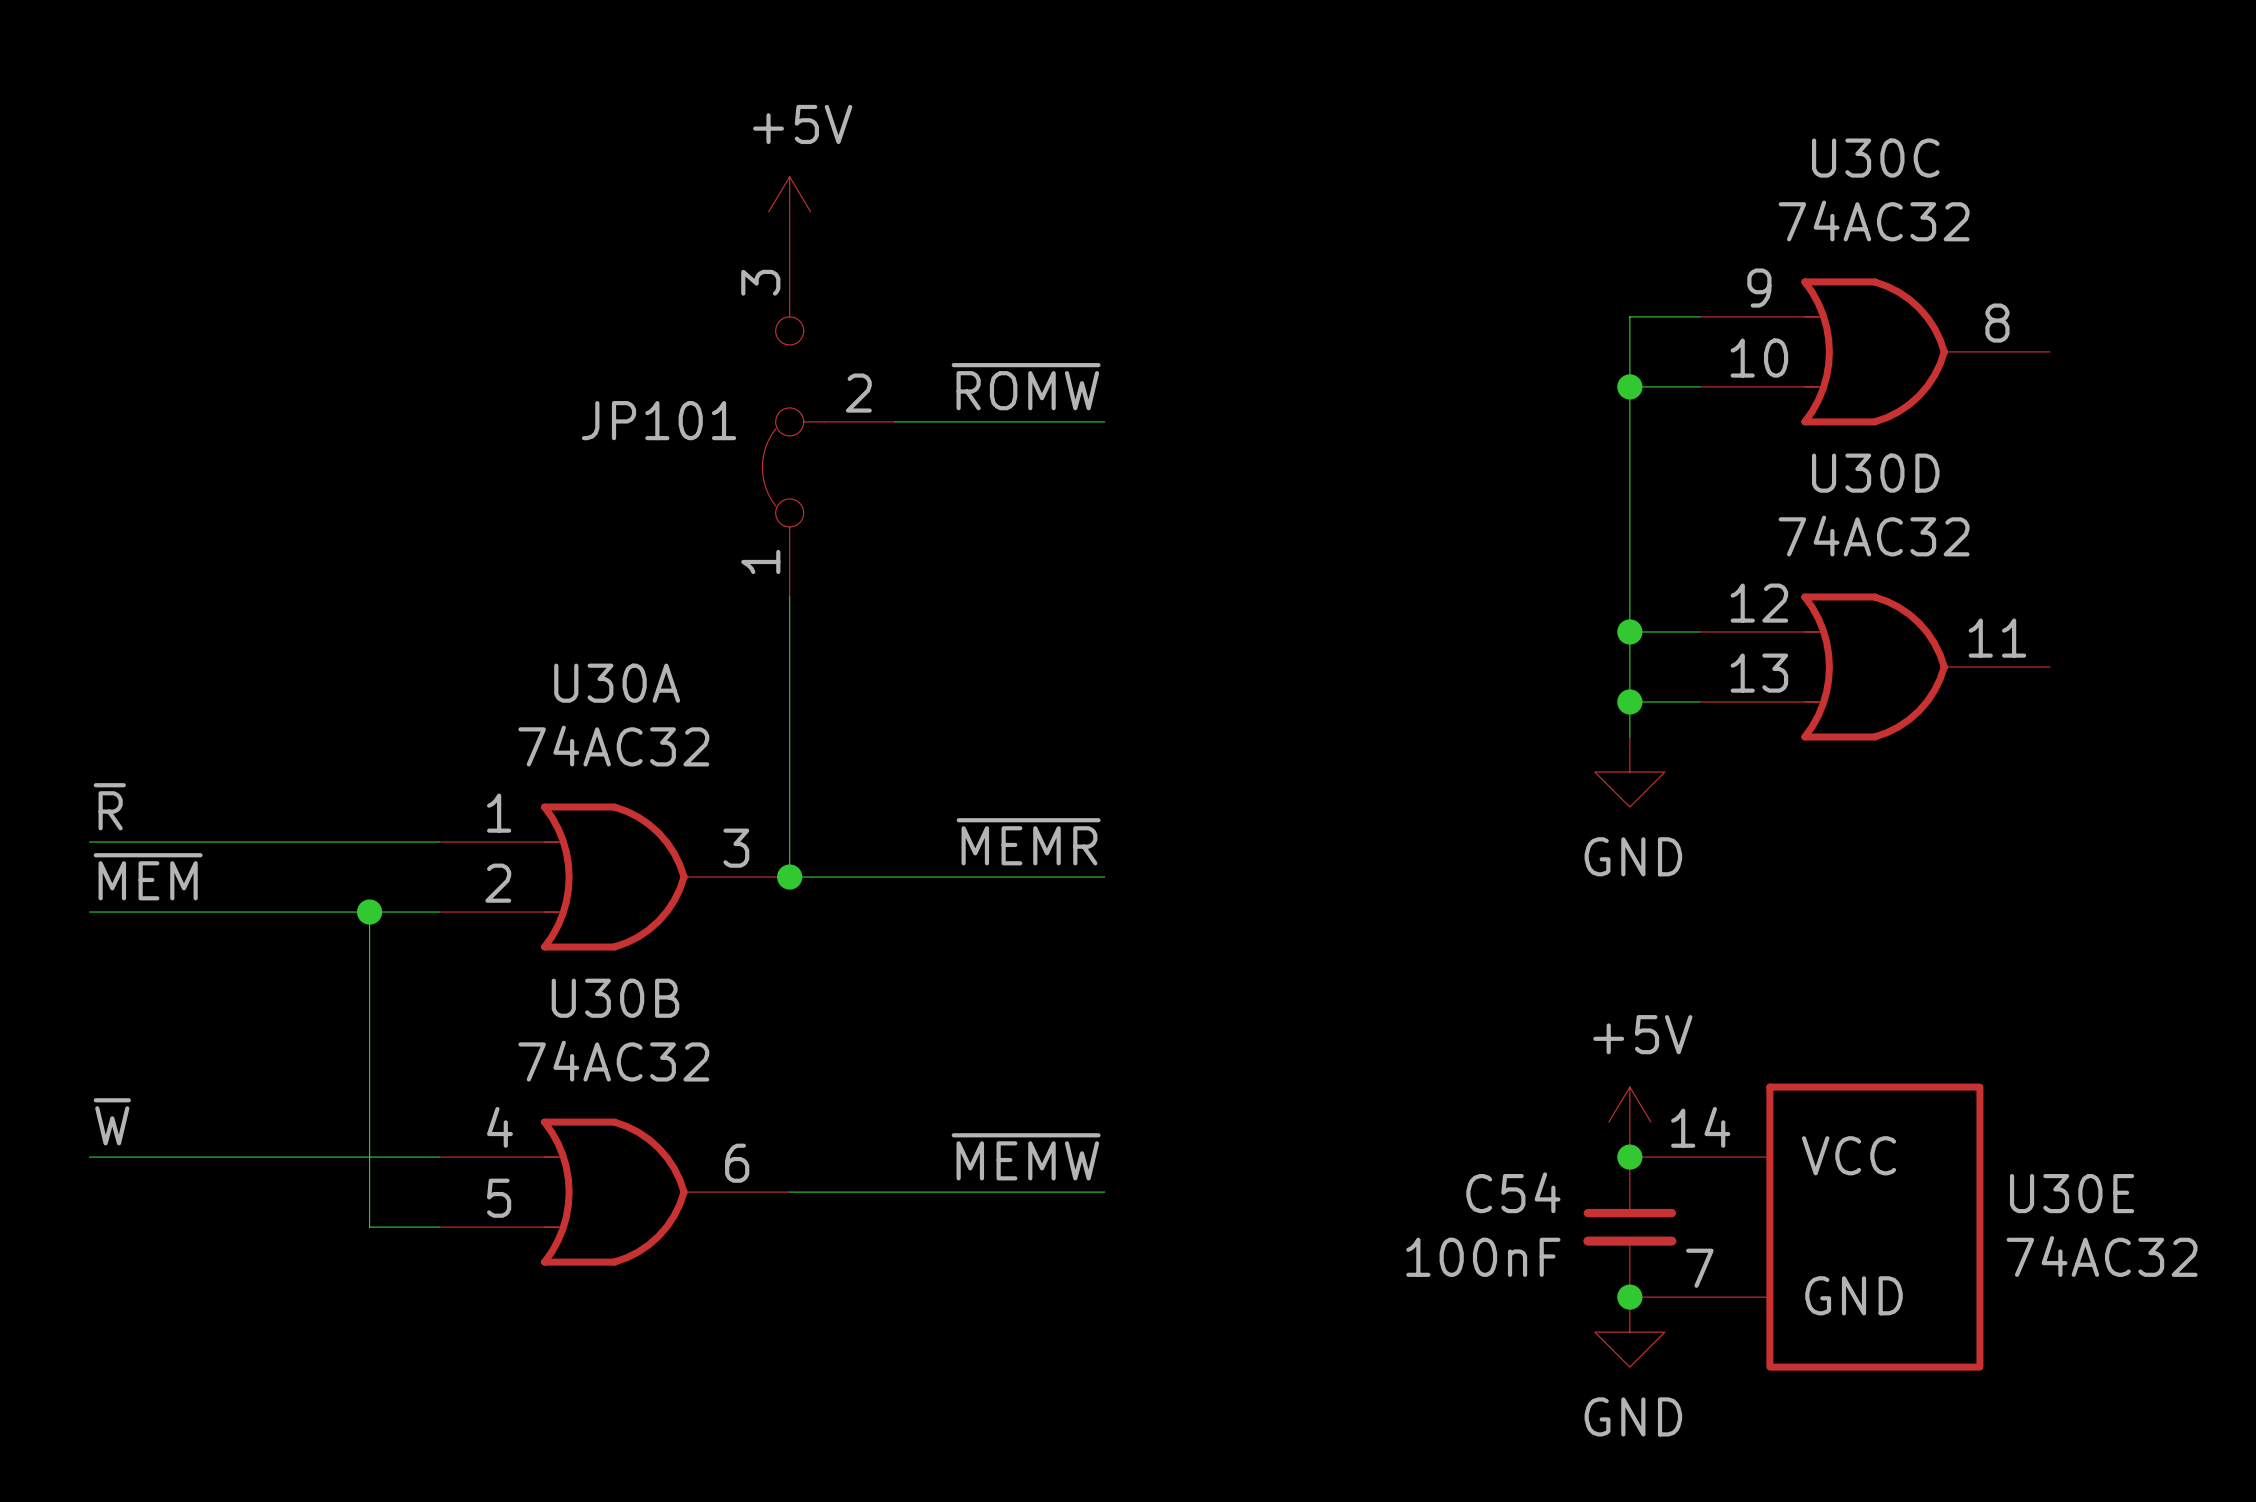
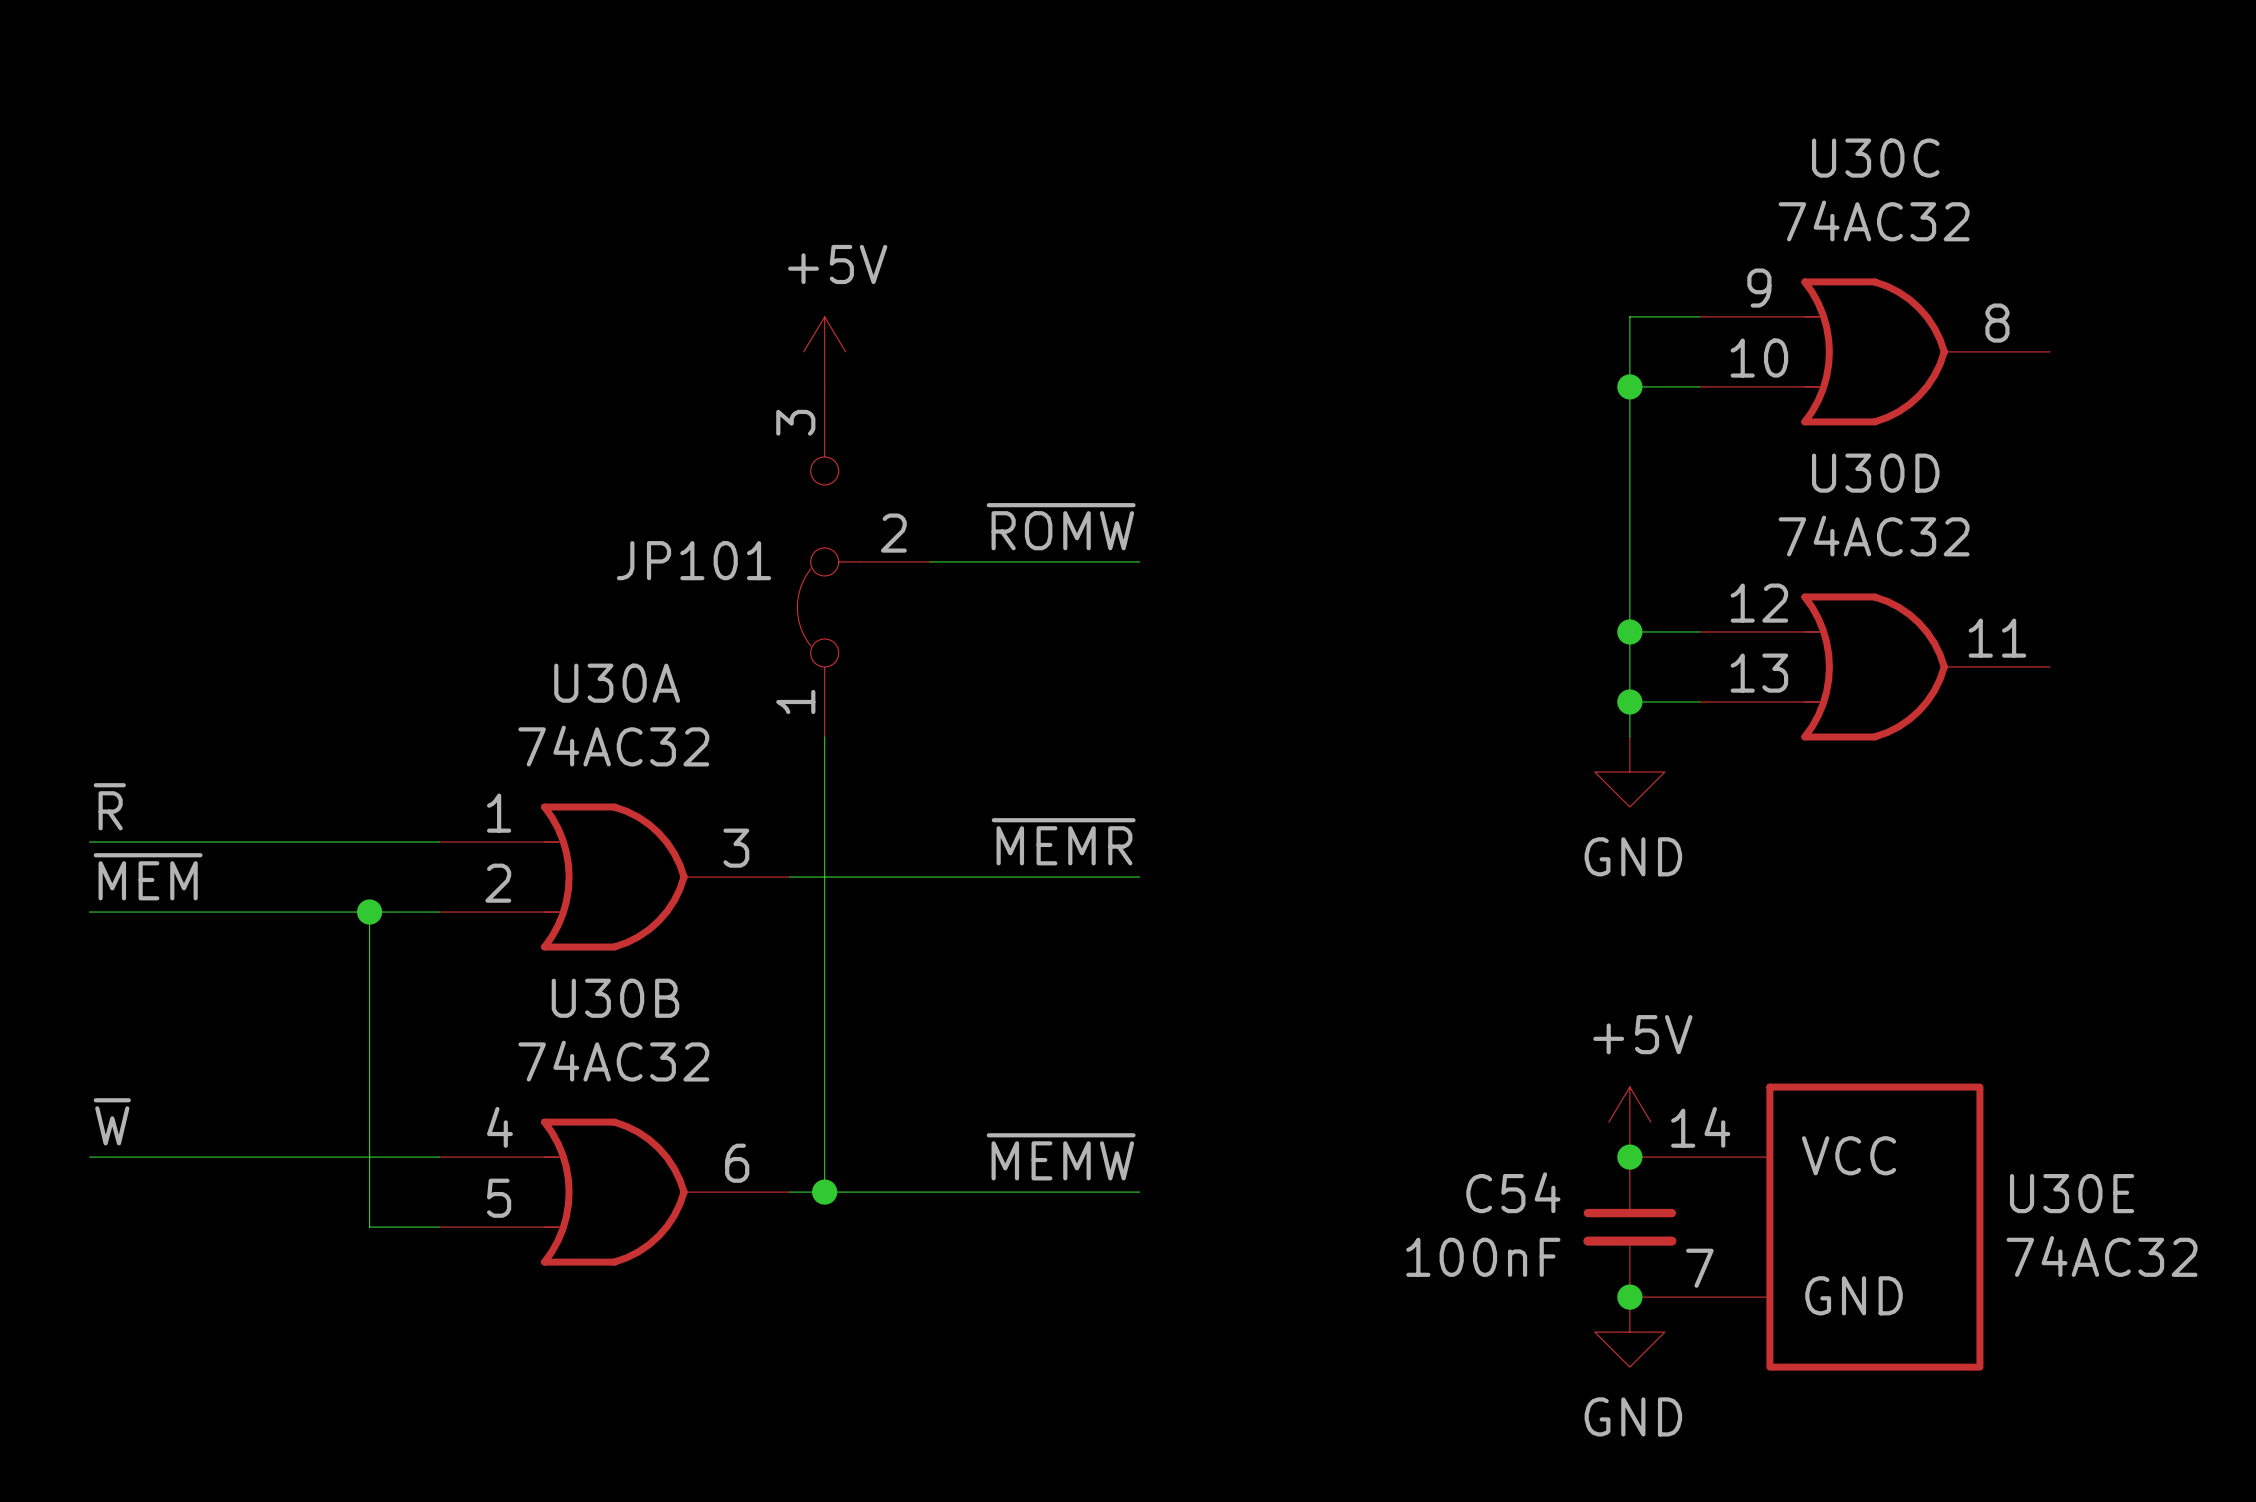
power symbol position: +5V (789, 211) -> +5V (824, 351)
label position: ~{ROMW} (1026, 386) -> ~{ROMW} (1061, 526)
JP101 position: (828, 421) -> (863, 561)
wire: (894, 421) (1104, 421) -> (929, 561) (1139, 561)
wire: (789, 596) (789, 877) -> none
wire: none -> (824, 736) (824, 1192)
label position: ~{MEMR} (1028, 841) -> ~{MEMR} (1063, 841)
junction: (789, 877) -> none
wire: none -> (1104, 877) (1139, 877)
label position: ~{MEMW} (1026, 1156) -> ~{MEMW} (1061, 1156)
junction: none -> (824, 1192)
wire: none -> (1104, 1192) (1139, 1192)

